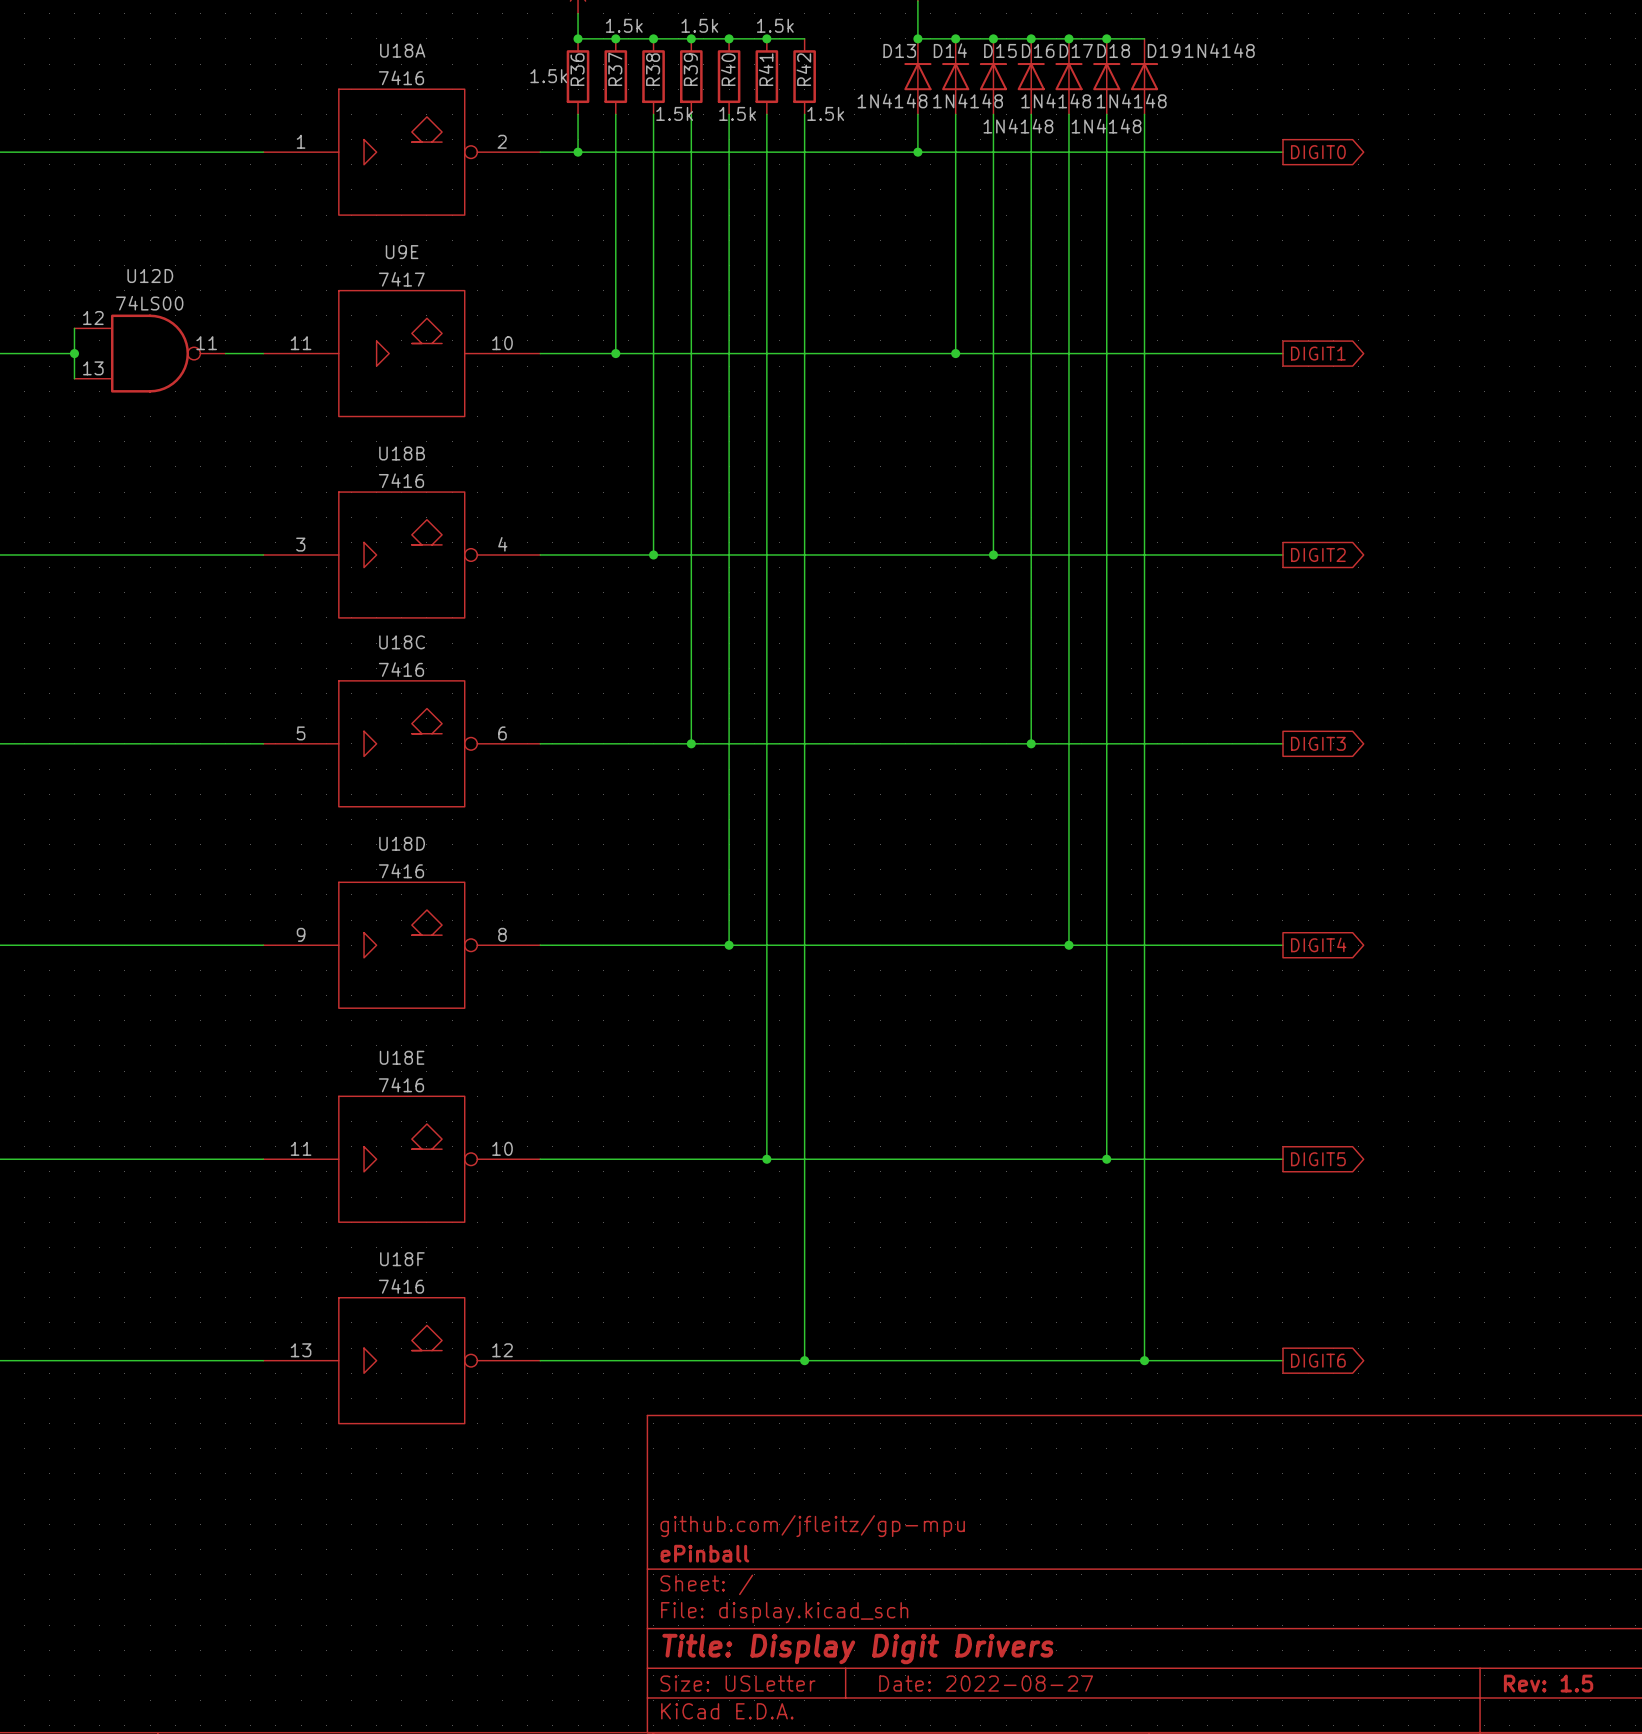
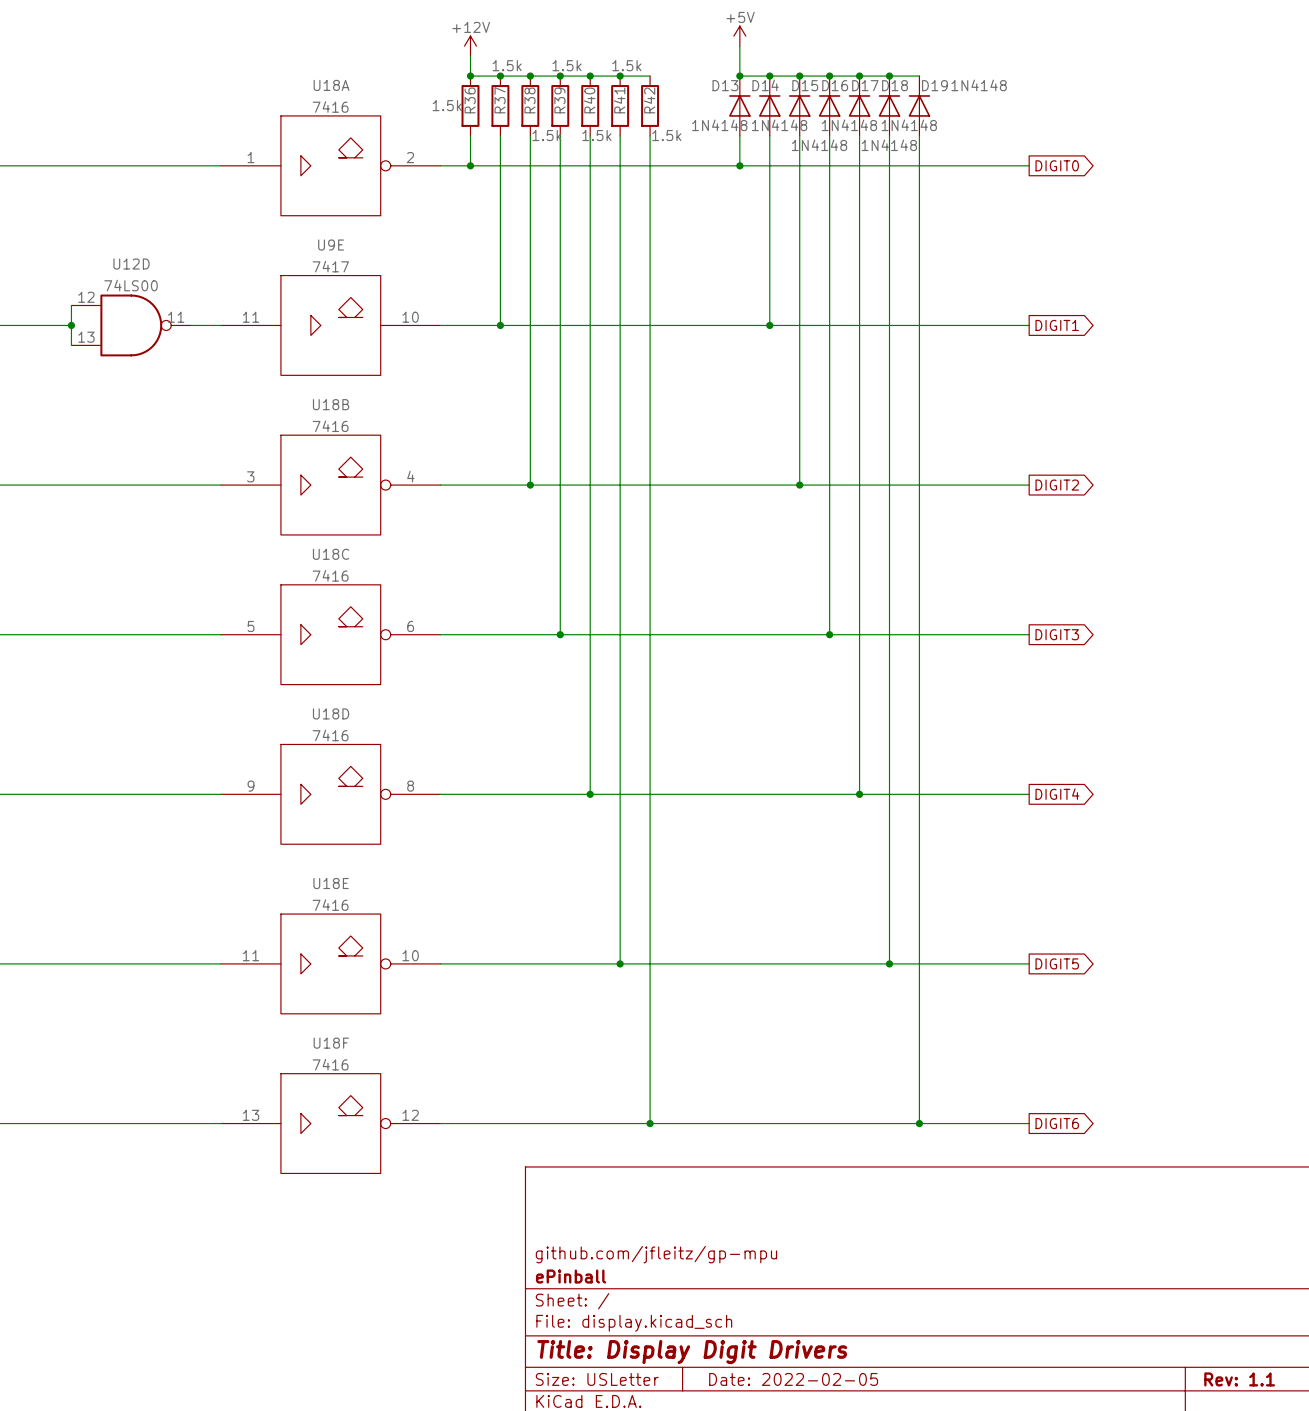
title block: Date: 2022-08-27 (986, 1683) -> Date: 2022-02-05 (793, 1379)
title block: Rev: 1.5 (1548, 1683) -> Rev: 1.1 (1239, 1379)

